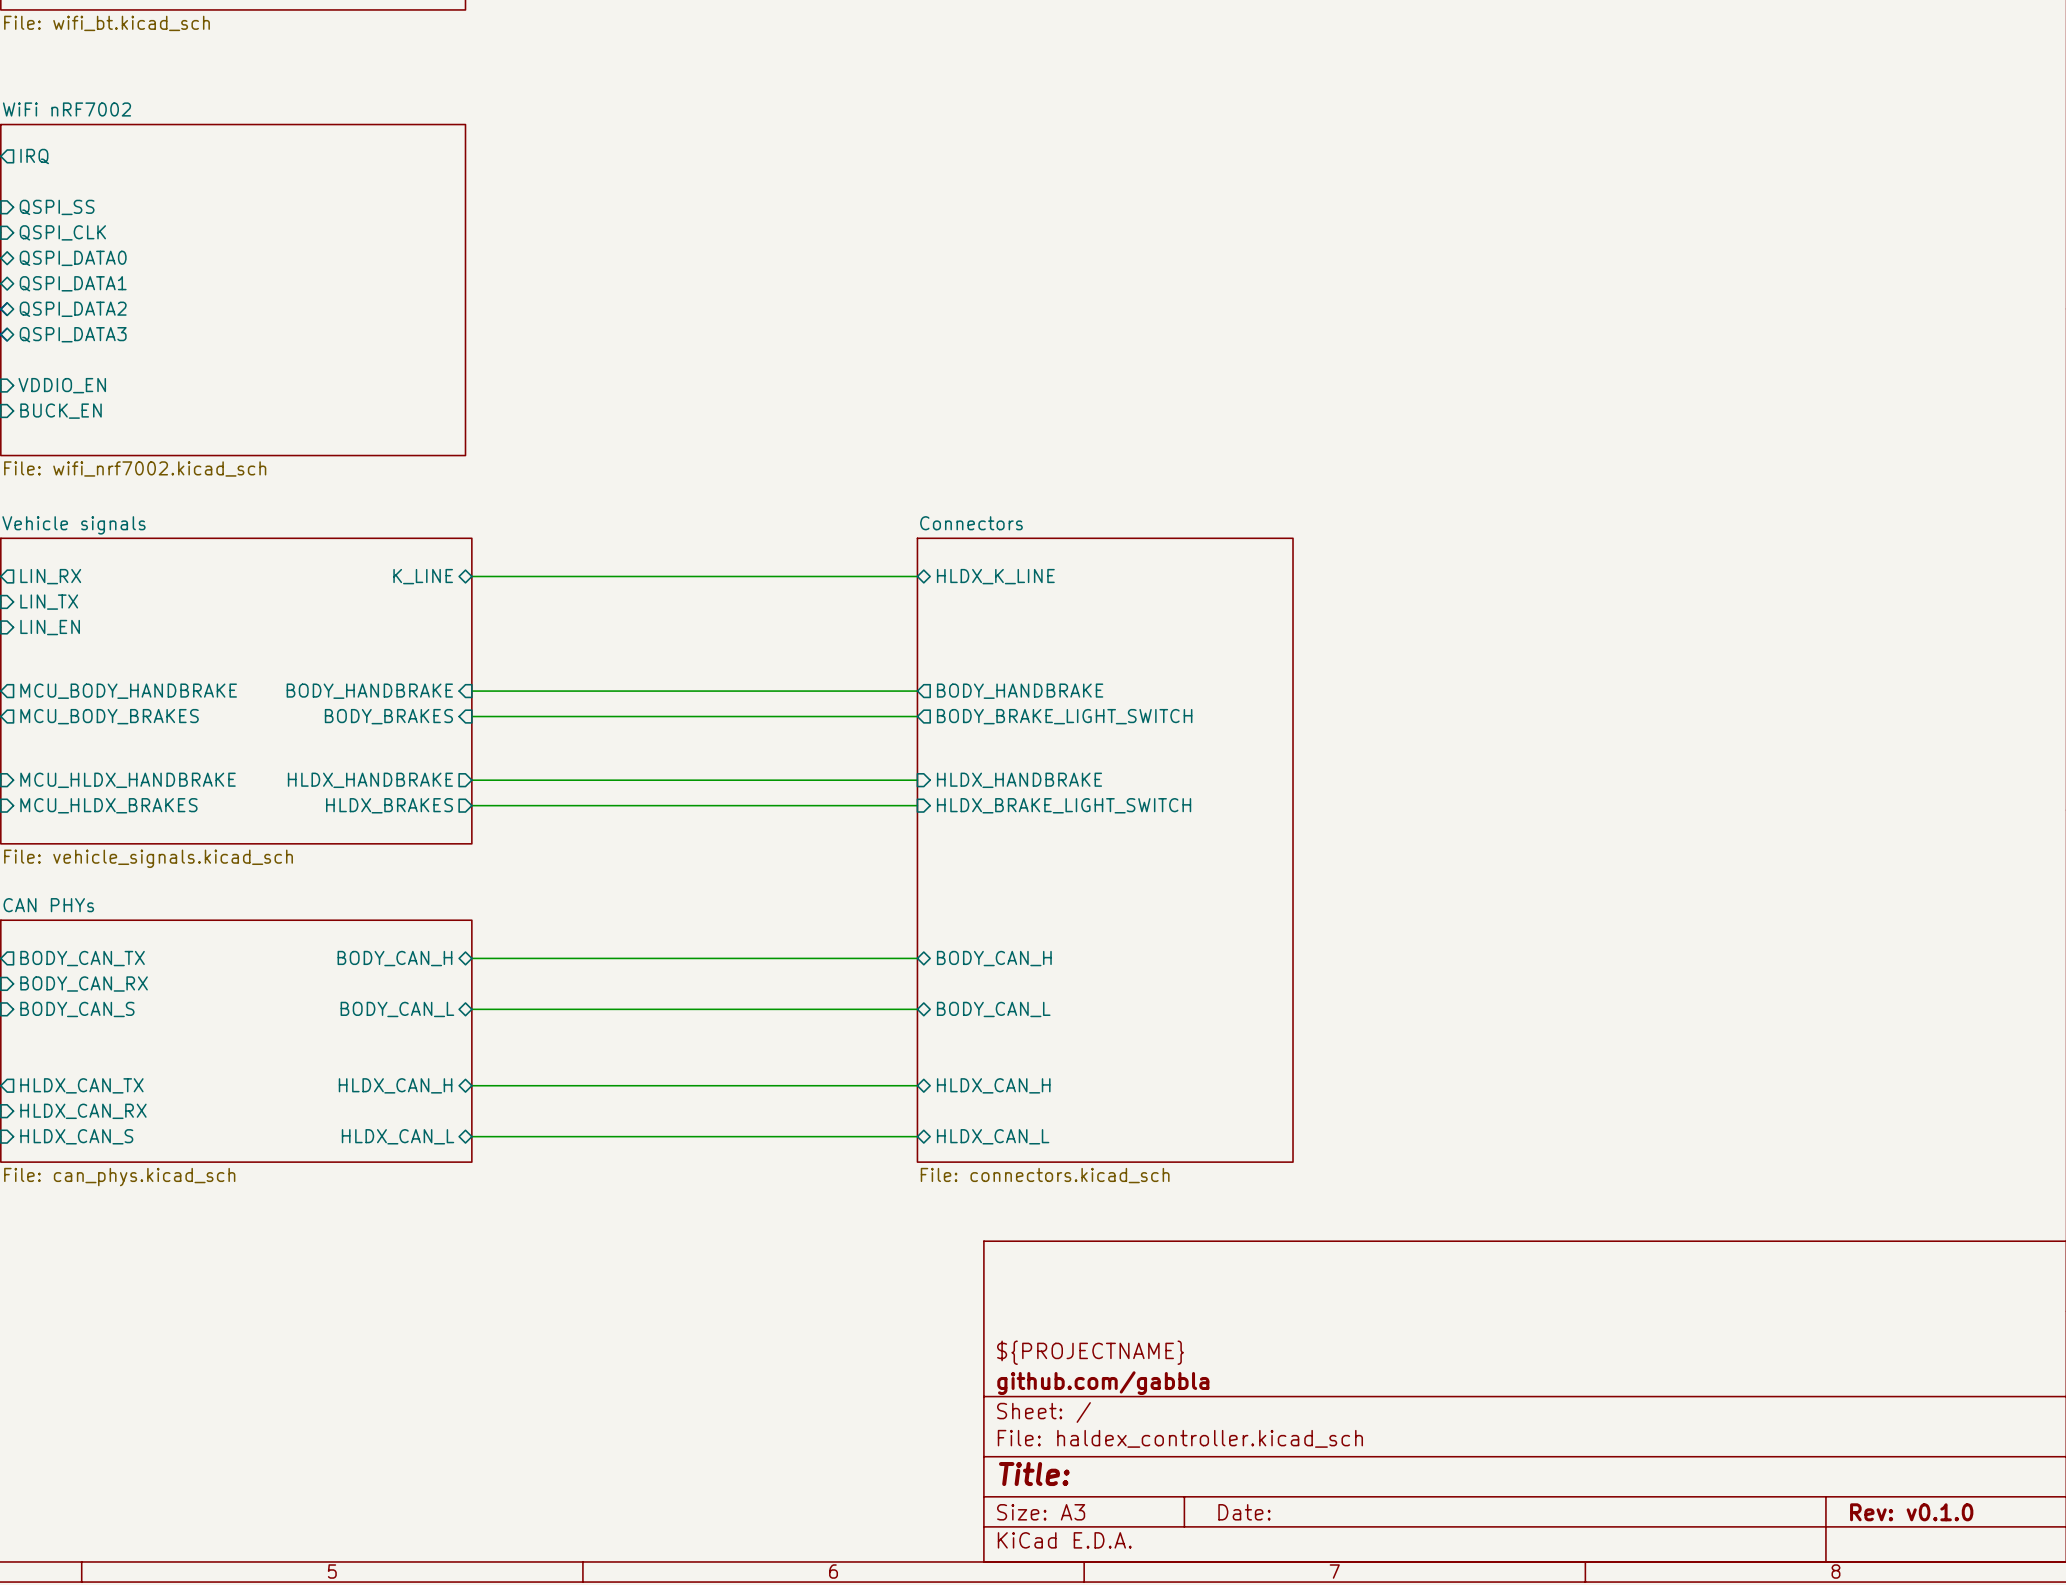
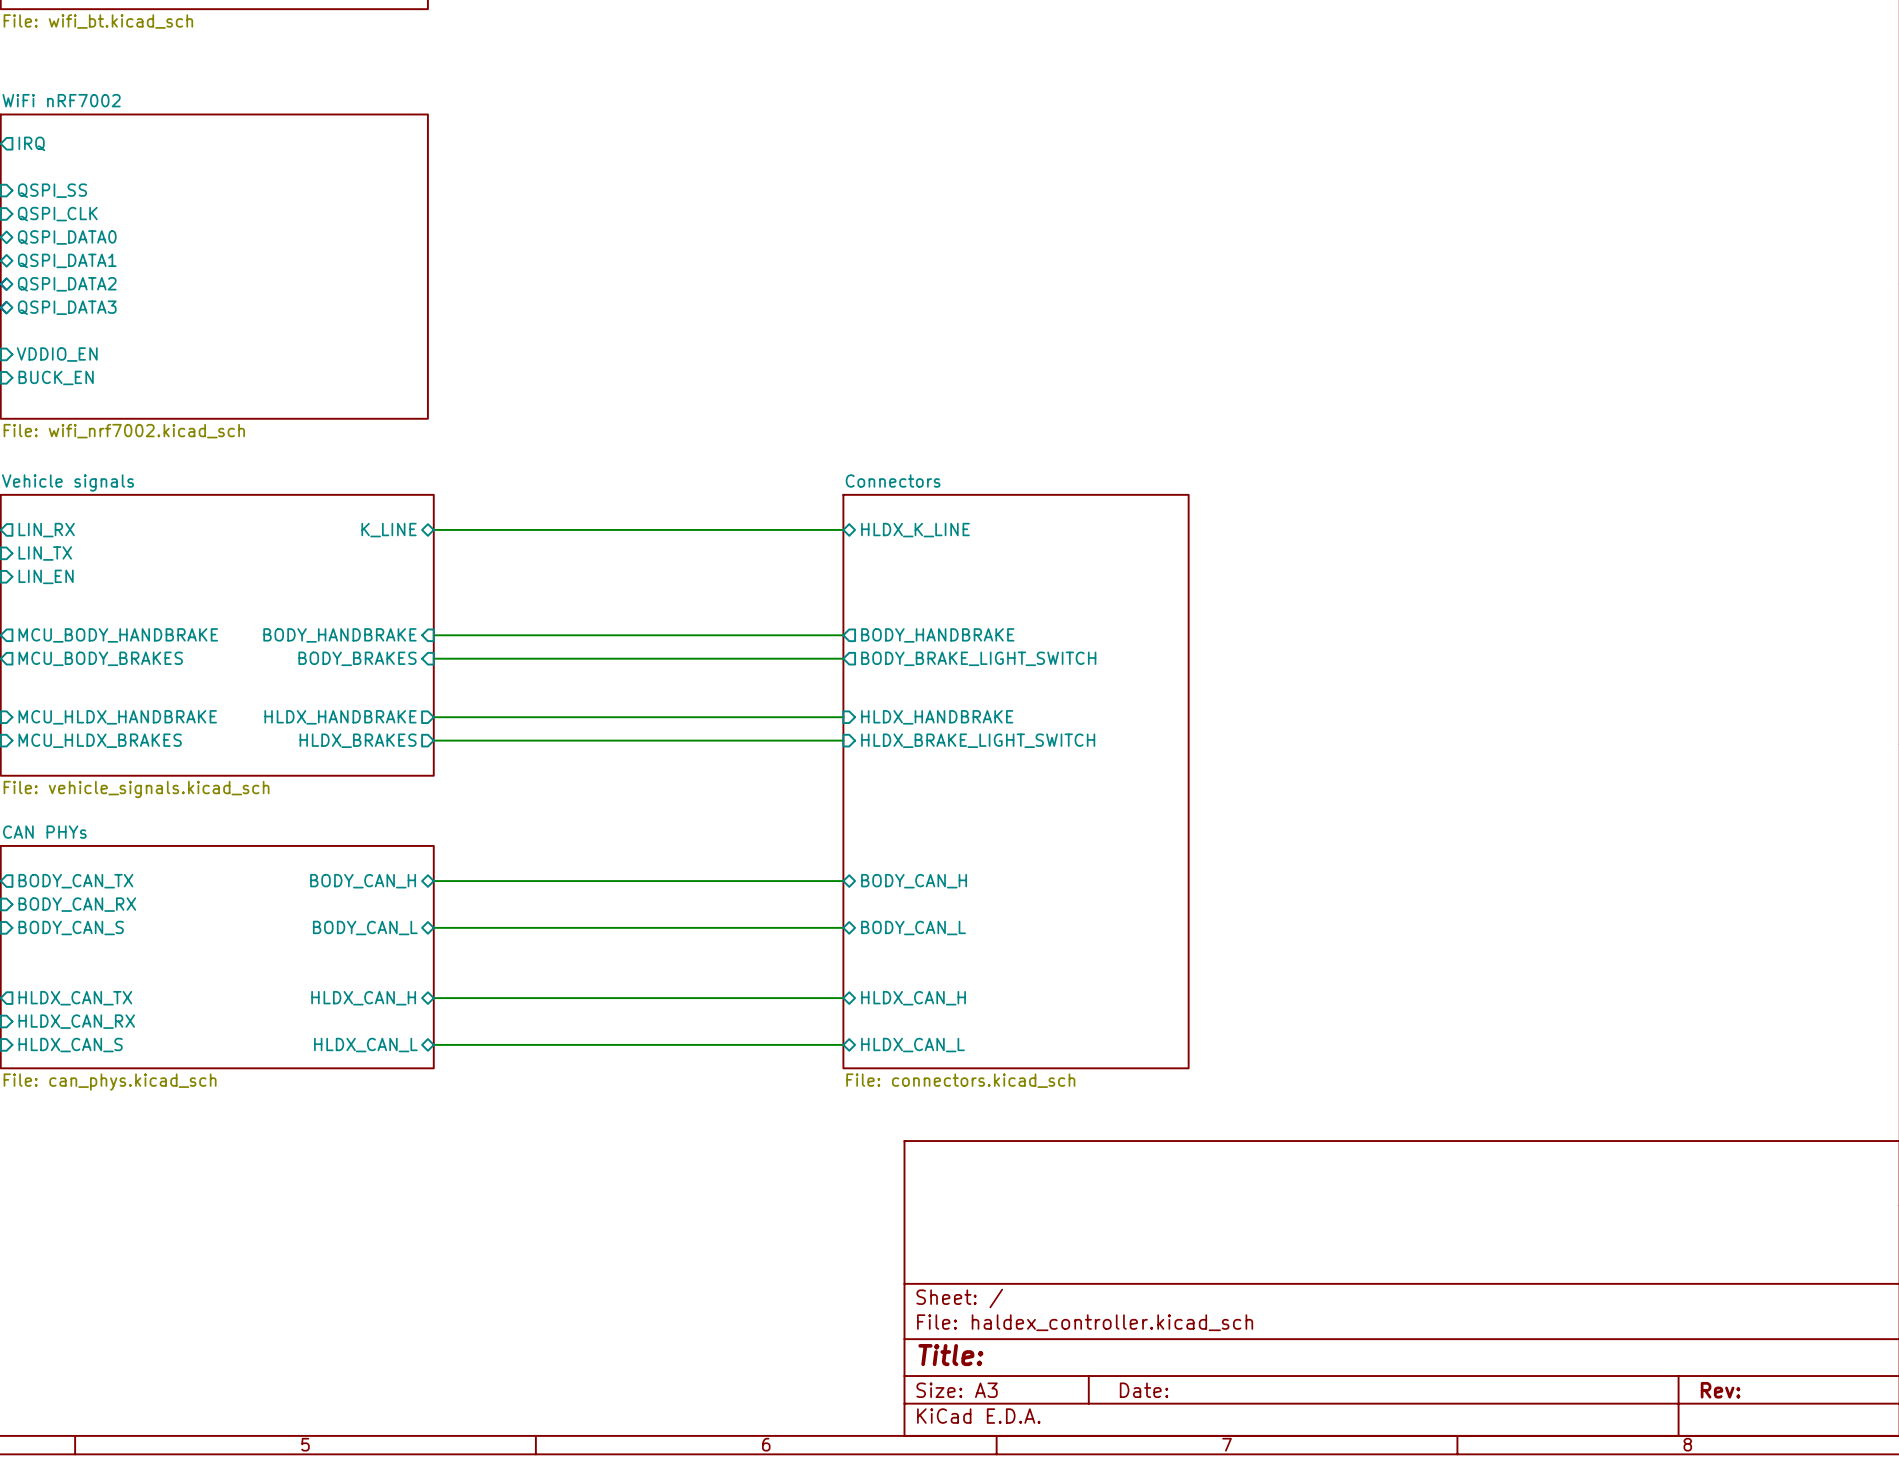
title block: ${PROJECTNAME} (1090, 1352) -> none
title block: github.com/gabbla (1103, 1383) -> none
title block: Rev: v0.1.0 (1911, 1512) -> Rev: (1720, 1390)

